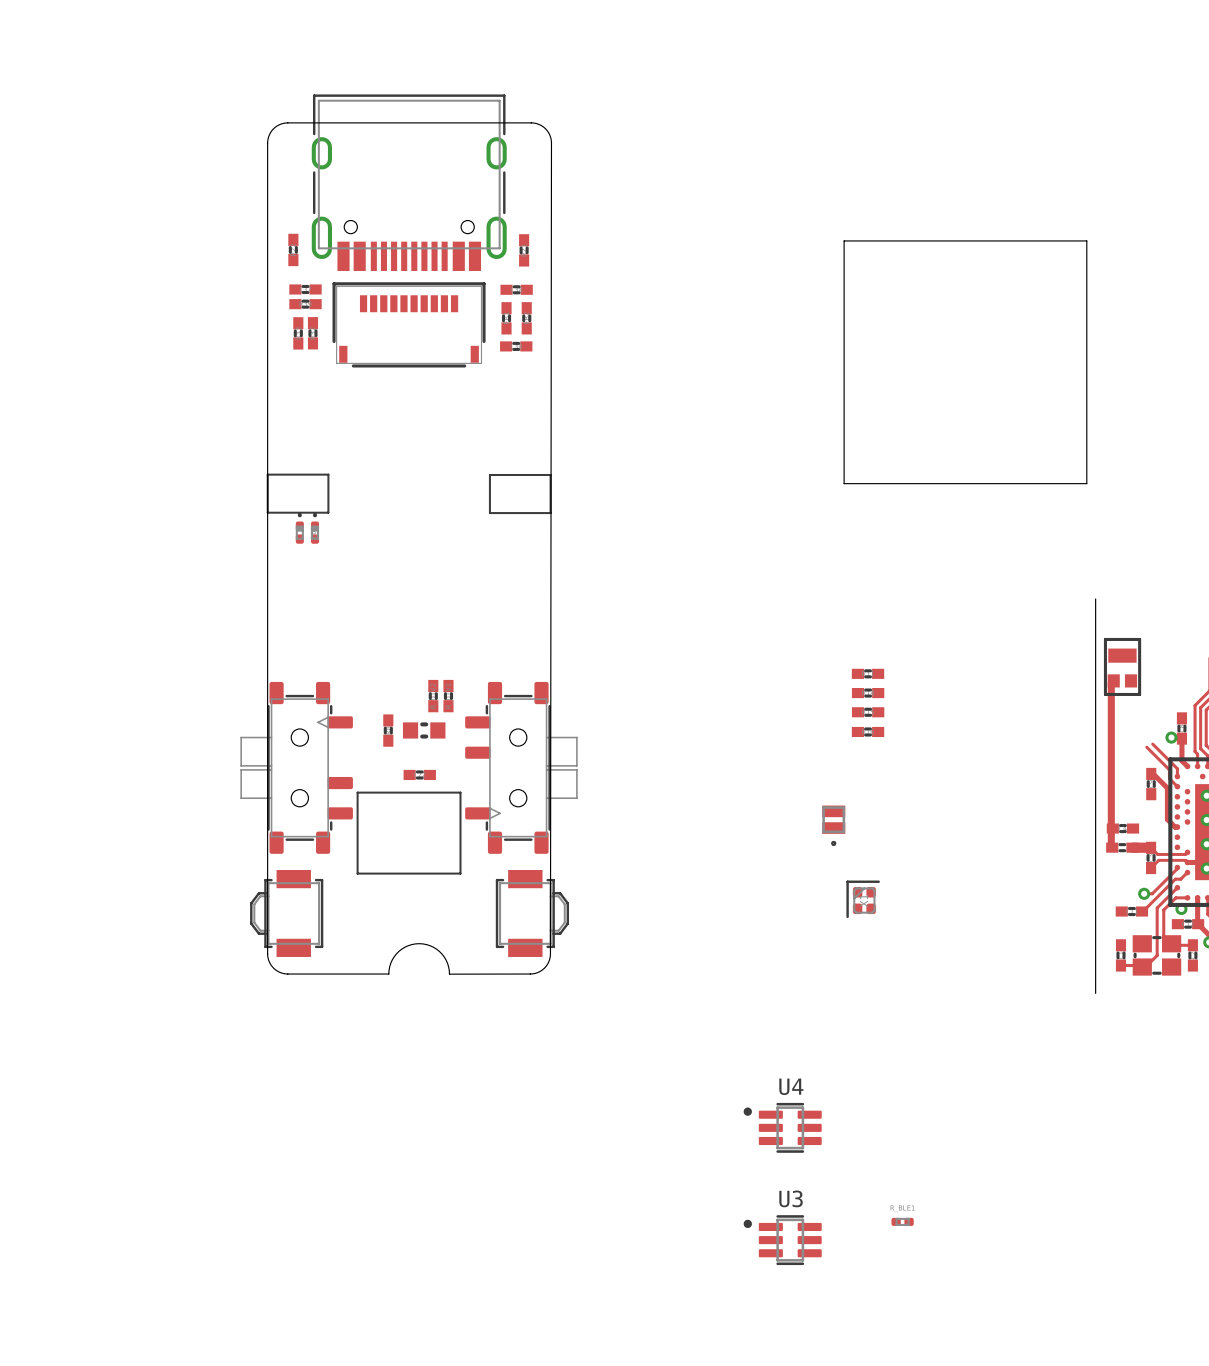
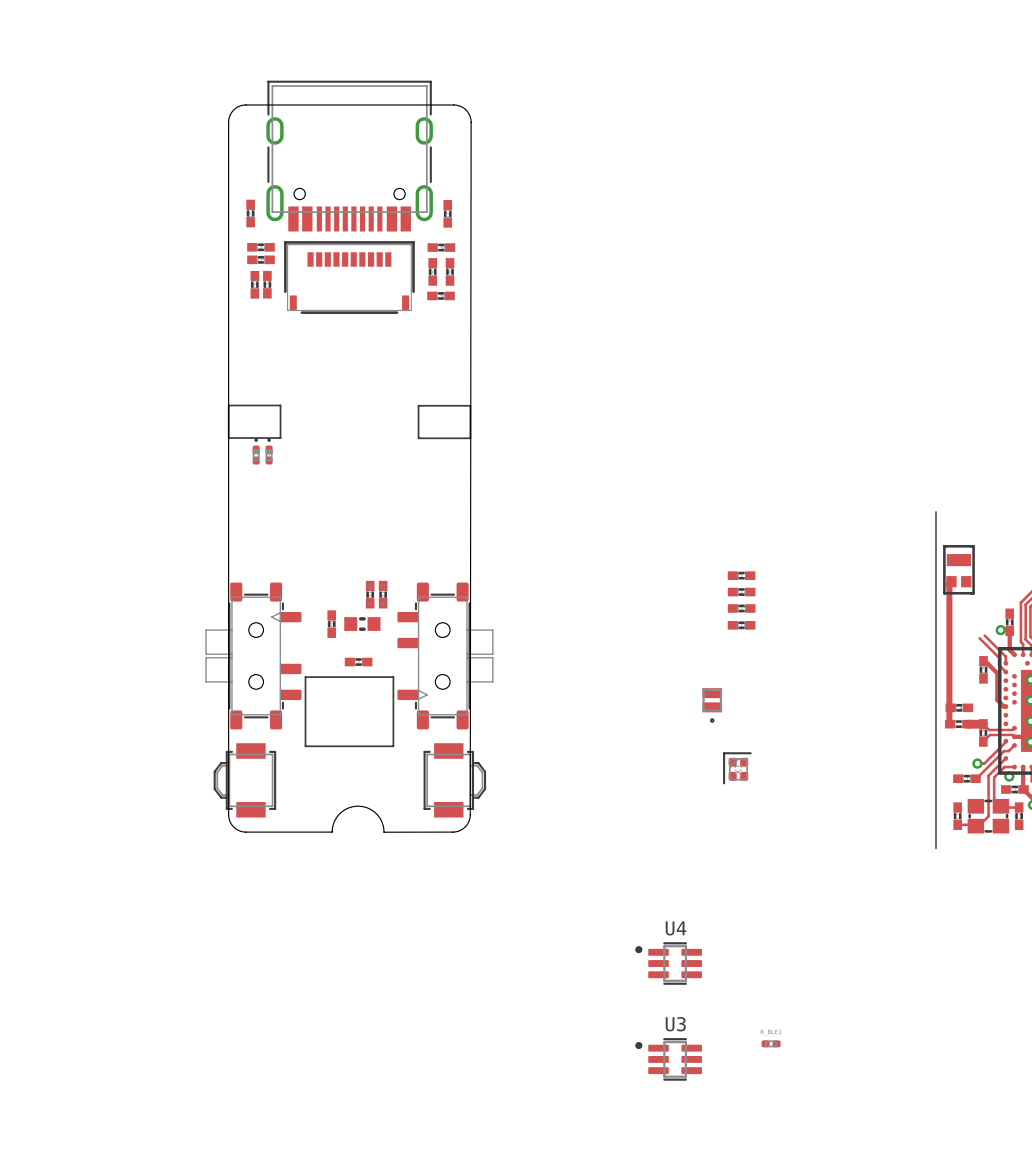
board edge: (844, 240) (844, 483) (1086, 483) (1086, 240) (844, 240) -> none

